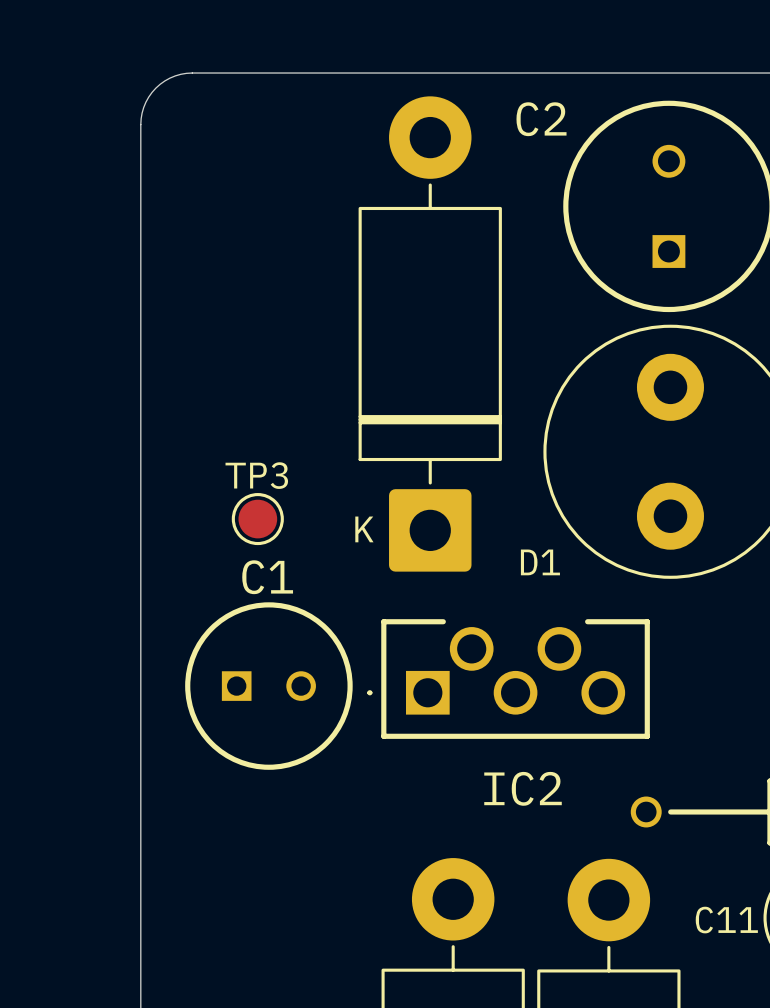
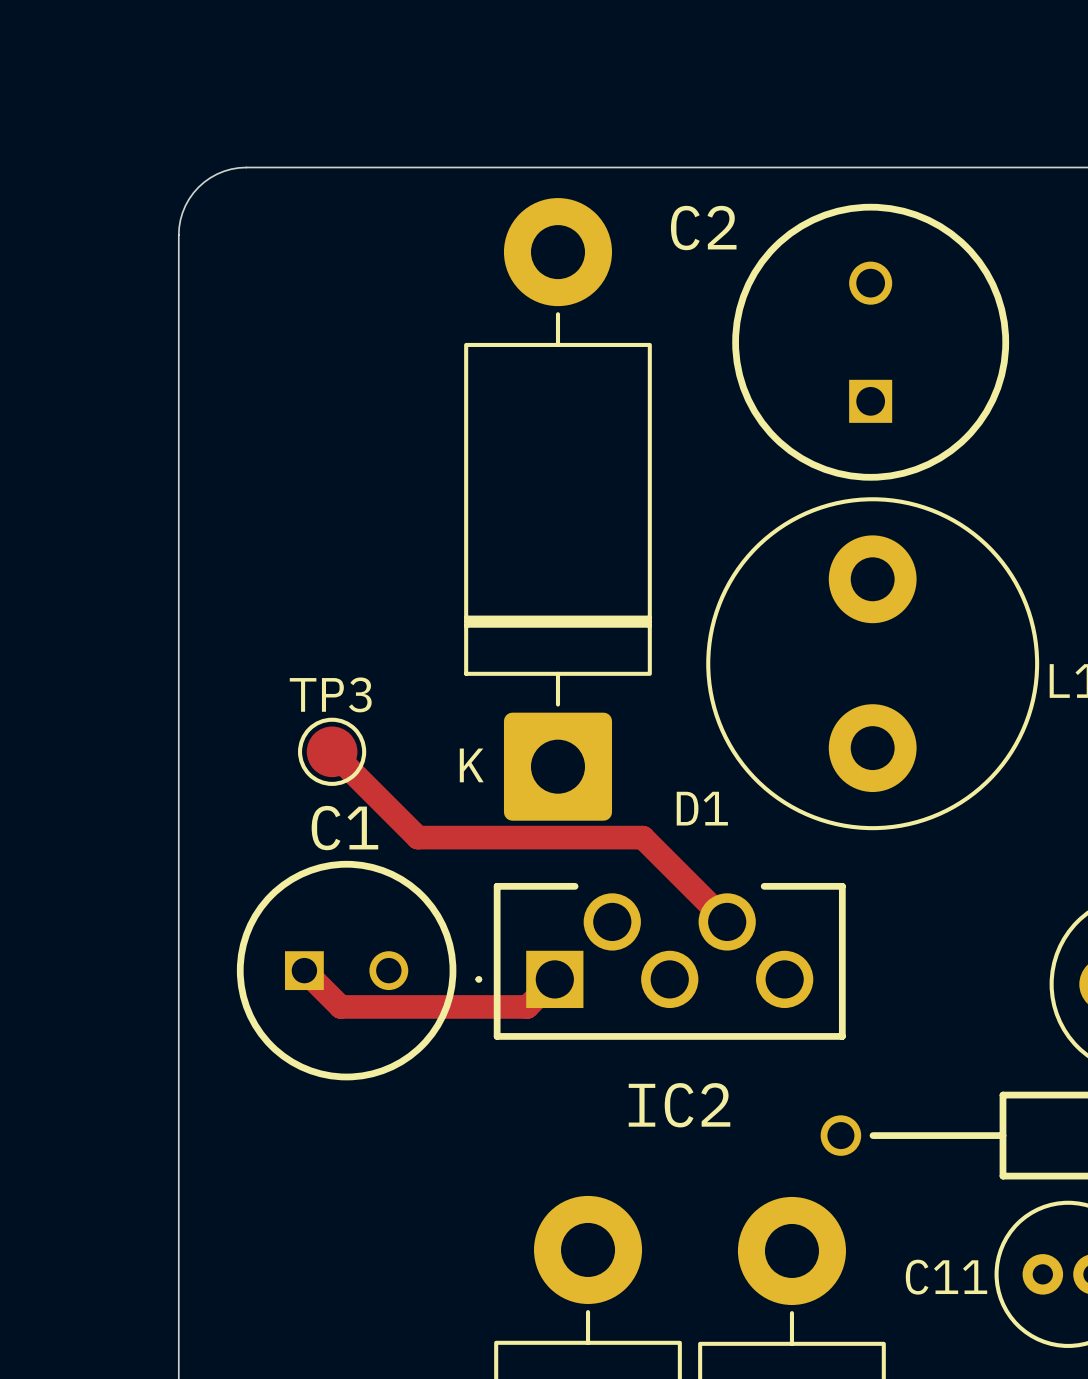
track: none -> (332, 751) (417, 837) (642, 837) (727, 921)
track: none -> (304, 970) (340, 1006) (527, 1006) (554, 979)

